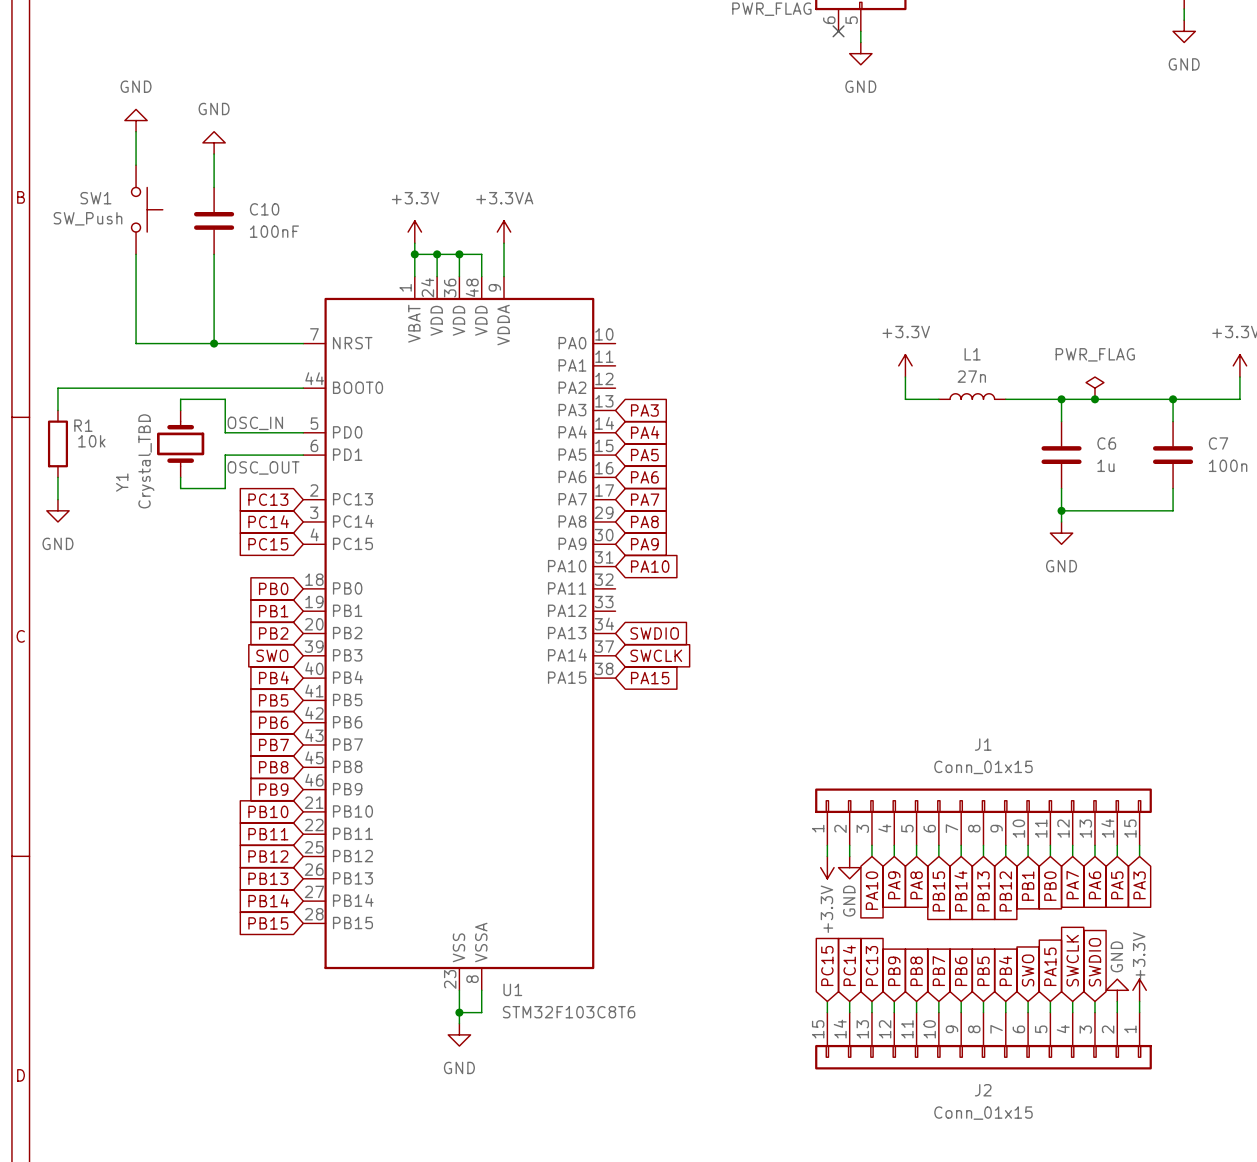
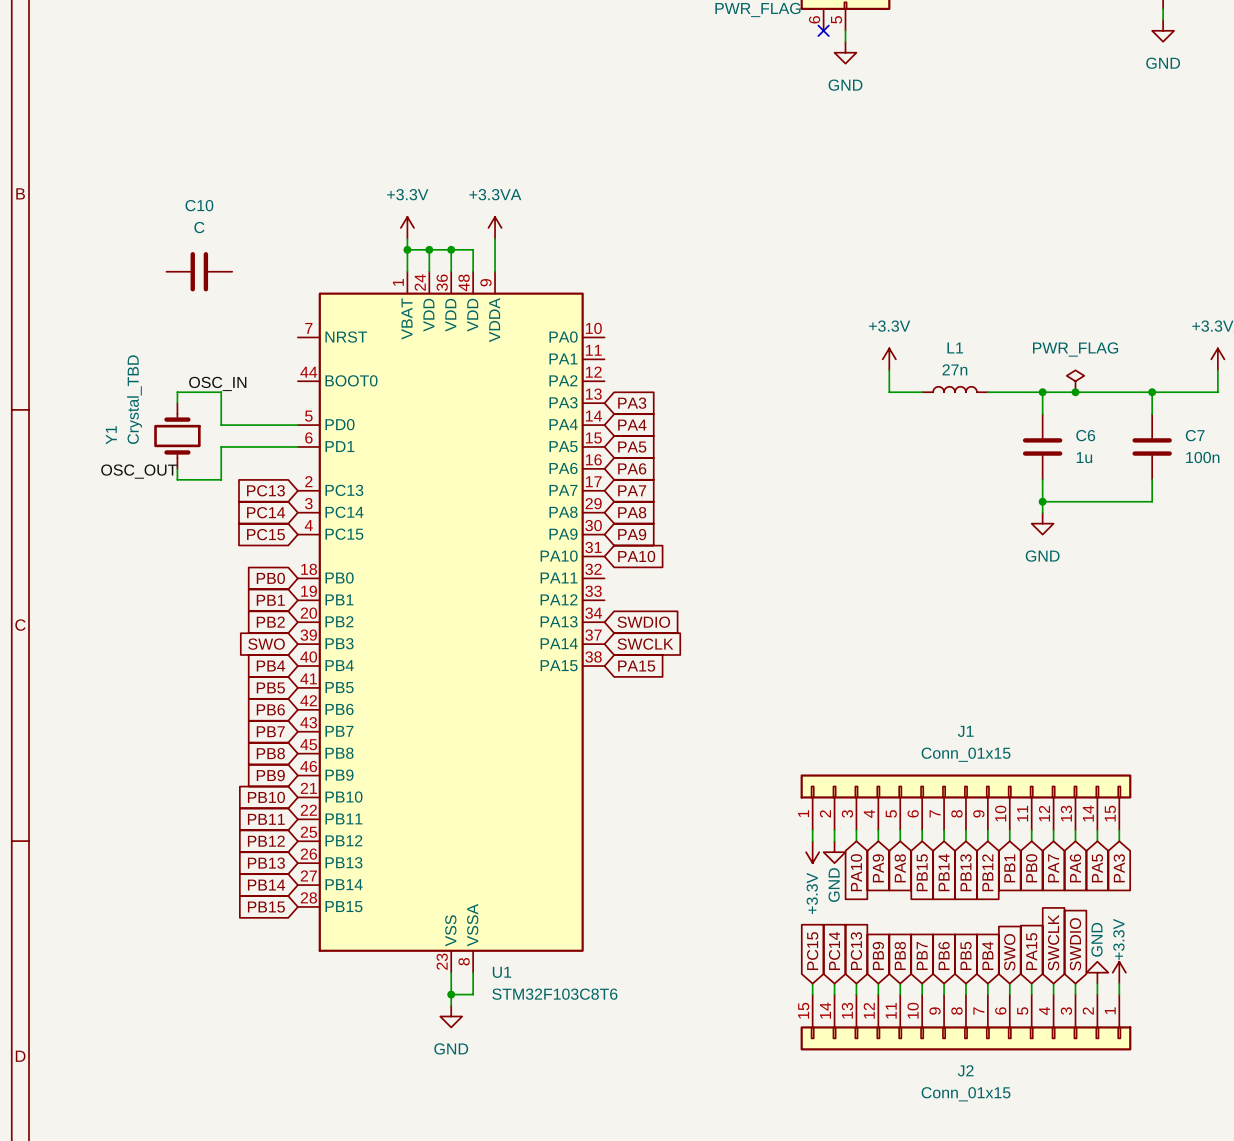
power symbol: GND (136, 120) -> none
wire: (136, 131) (136, 165) -> none
power symbol: GND (214, 142) -> none
wire: (214, 154) (214, 187) -> none
SW1: SW_Push (147, 209) -> none
C10 name position: C10 (264, 209) -> C10 (199, 205)
C10 rotation: 0° (214, 220) -> 90° clockwise (199, 271)
C10 position: (214, 220) -> (199, 271)
C10 value: 100nF (274, 231) -> C (199, 227)
wire: (136, 254) (136, 343) (303, 343) -> none
wire: (214, 254) (214, 343) -> none
junction: (214, 343) -> none
wire: (303, 388) (57, 388) (57, 410) -> none
label position: OSC_IN (255, 423) -> OSC_IN (217, 383)
R1: 10k (57, 443) -> none
Y1 value position: Crystal_TBD (146, 461) -> Crystal_TBD (134, 399)
label position: OSC_OUT (263, 467) -> OSC_OUT (139, 471)
wire: (57, 477) (57, 499) -> none
Y1 name position: Y1 (122, 482) -> Y1 (111, 435)
power symbol: GND (57, 510) -> none

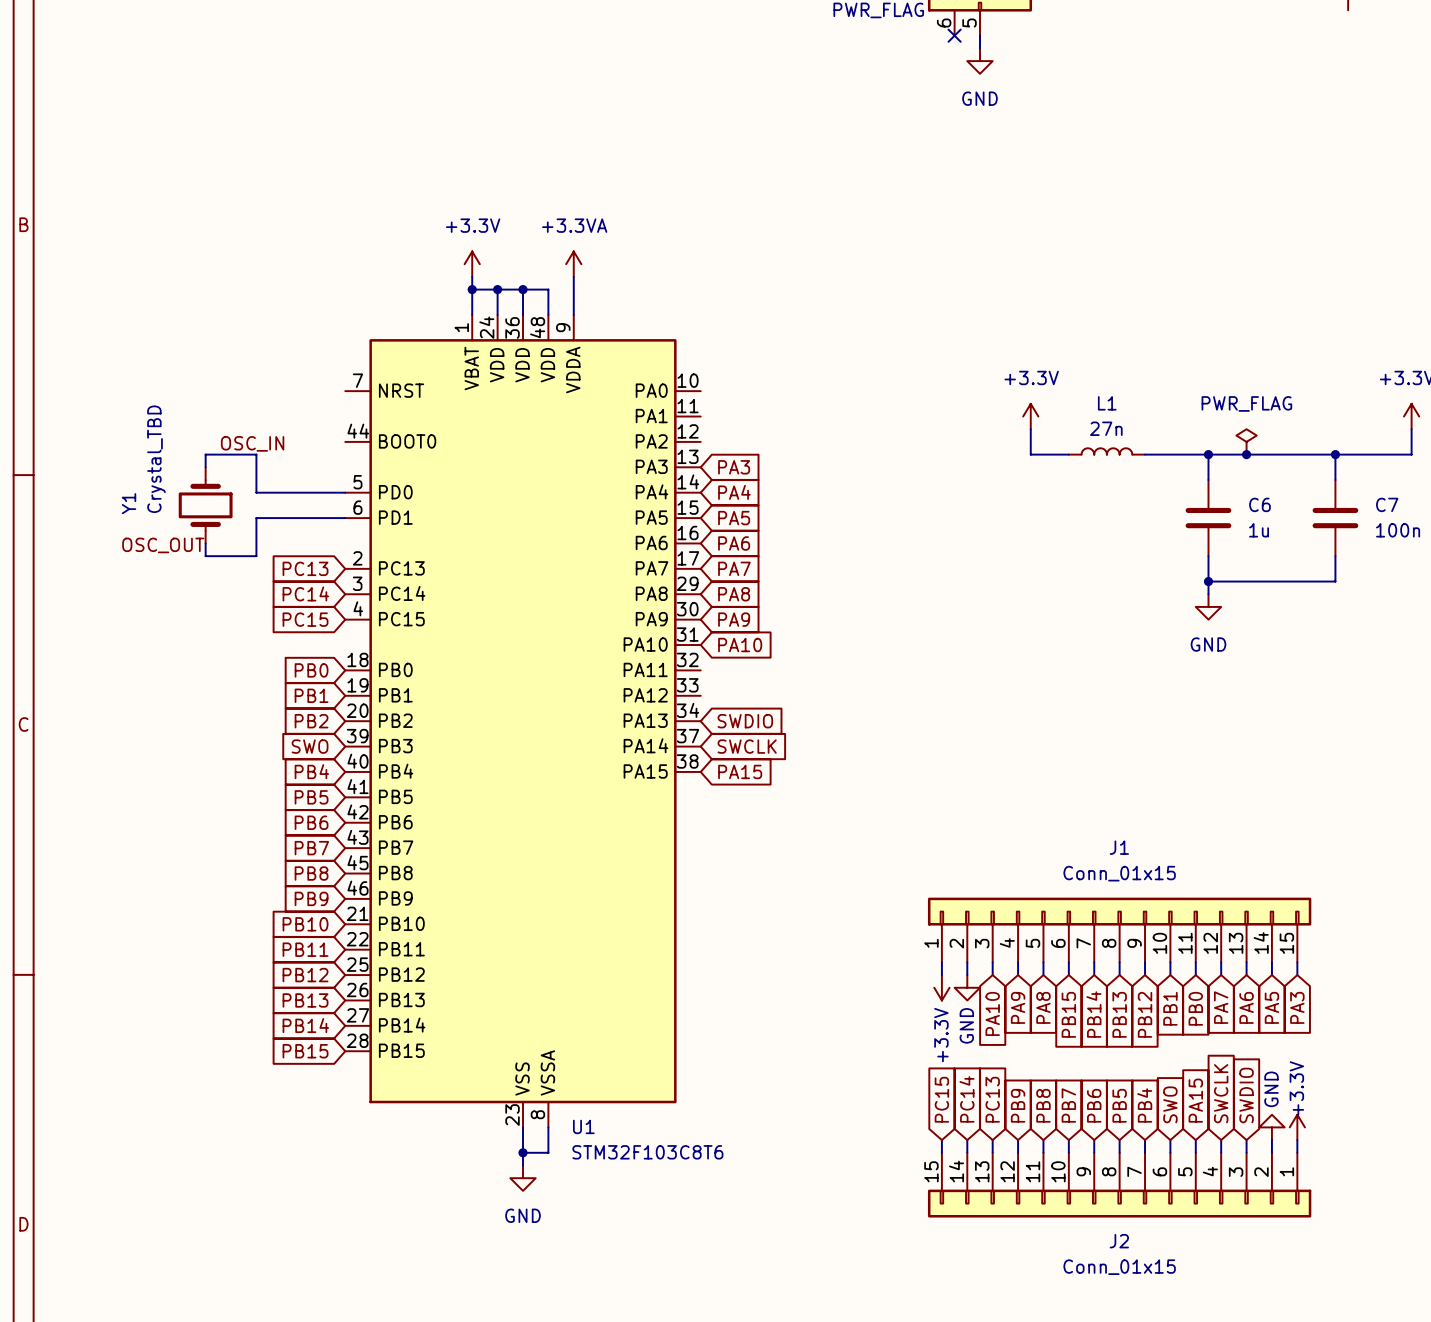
wire: (1163, 8) (1163, 19) -> none
power symbol: GND (1163, 30) -> none
C10: C (199, 271) -> none

